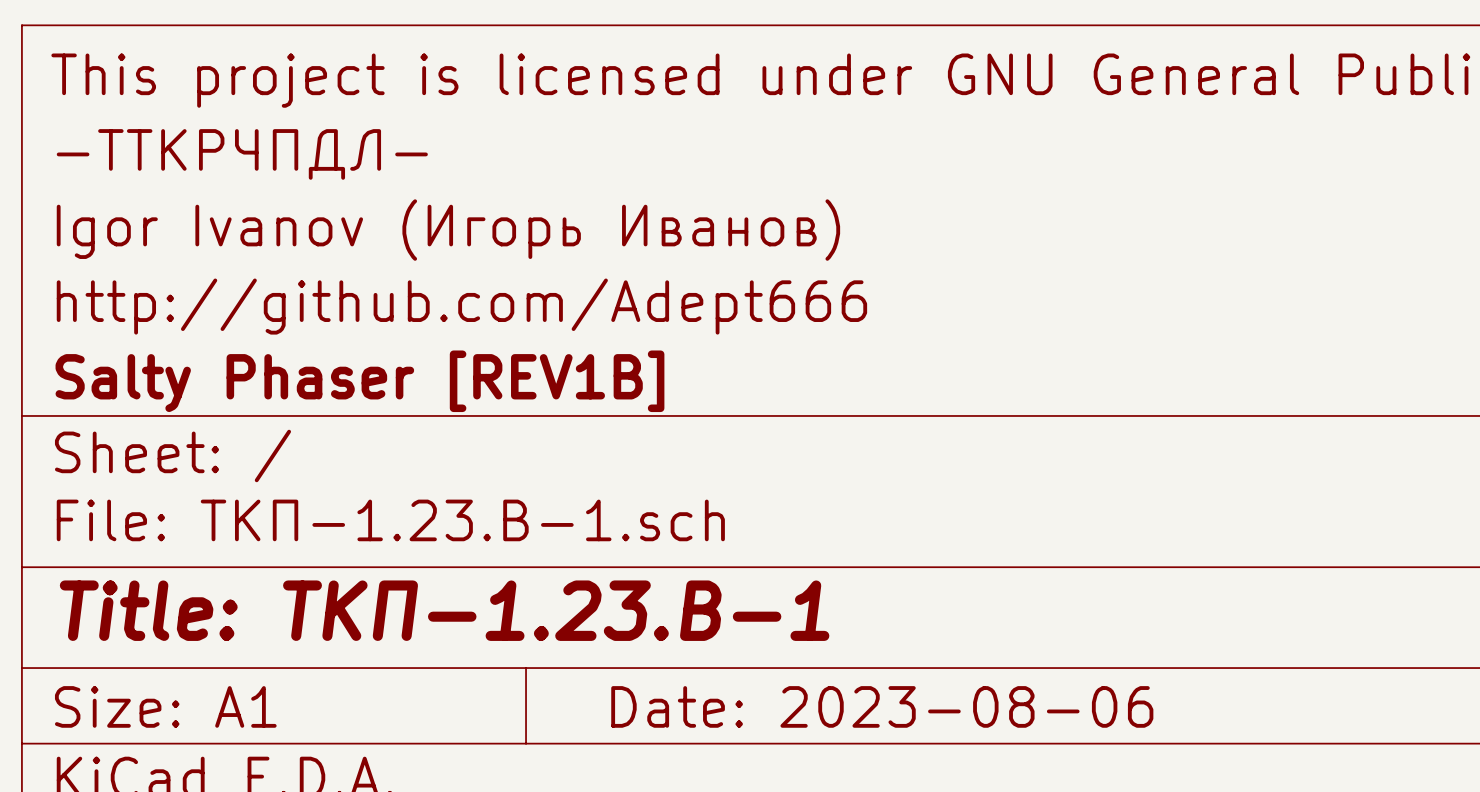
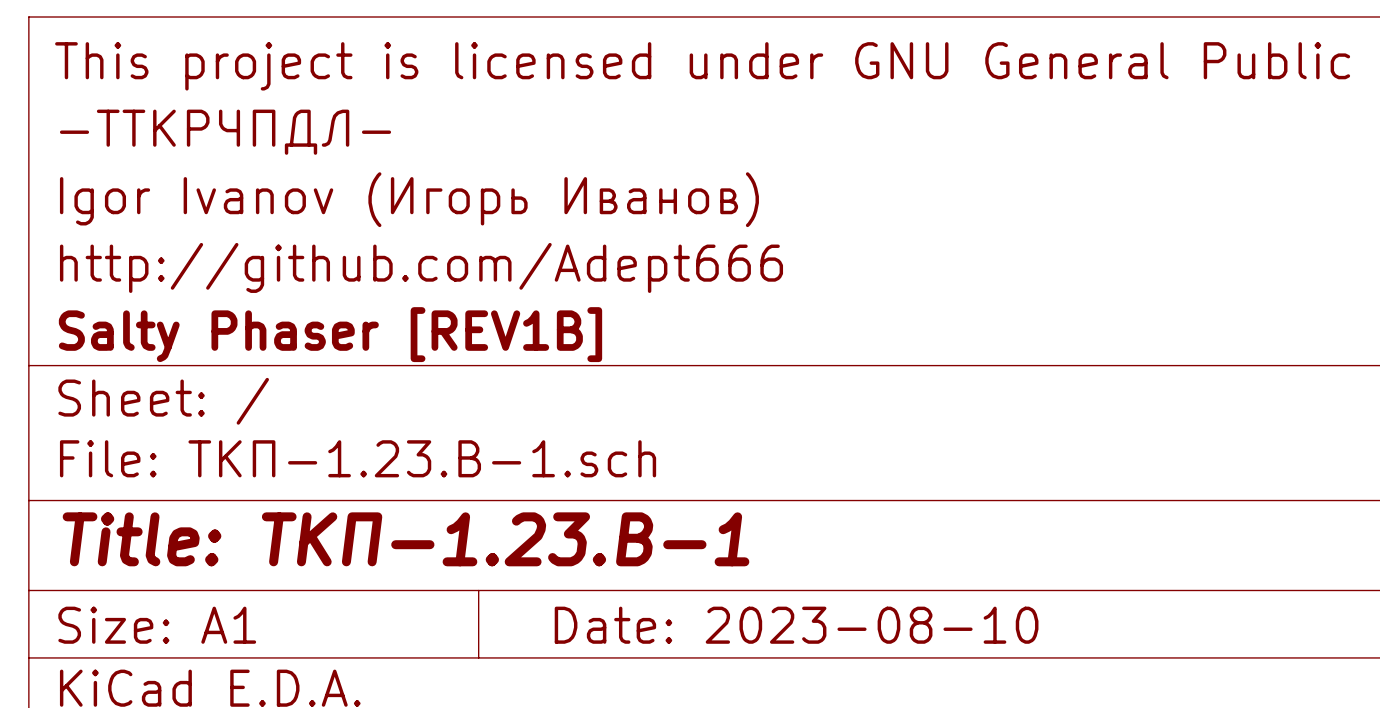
title block: Date: 2023-08-06 (882, 706) -> Date: 2023-08-10 (796, 625)

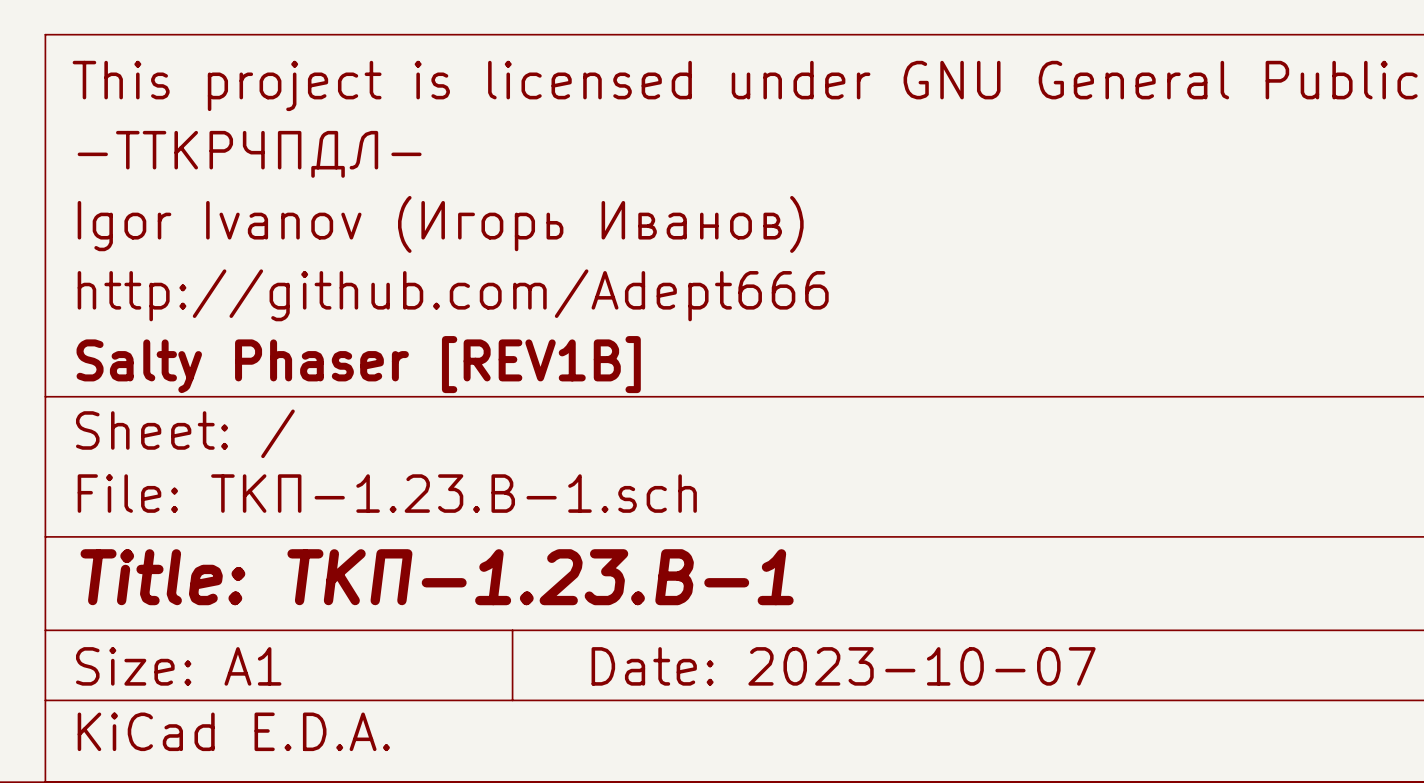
title block: Date: 2023-08-10 (796, 625) -> Date: 2023-10-07 (843, 666)

